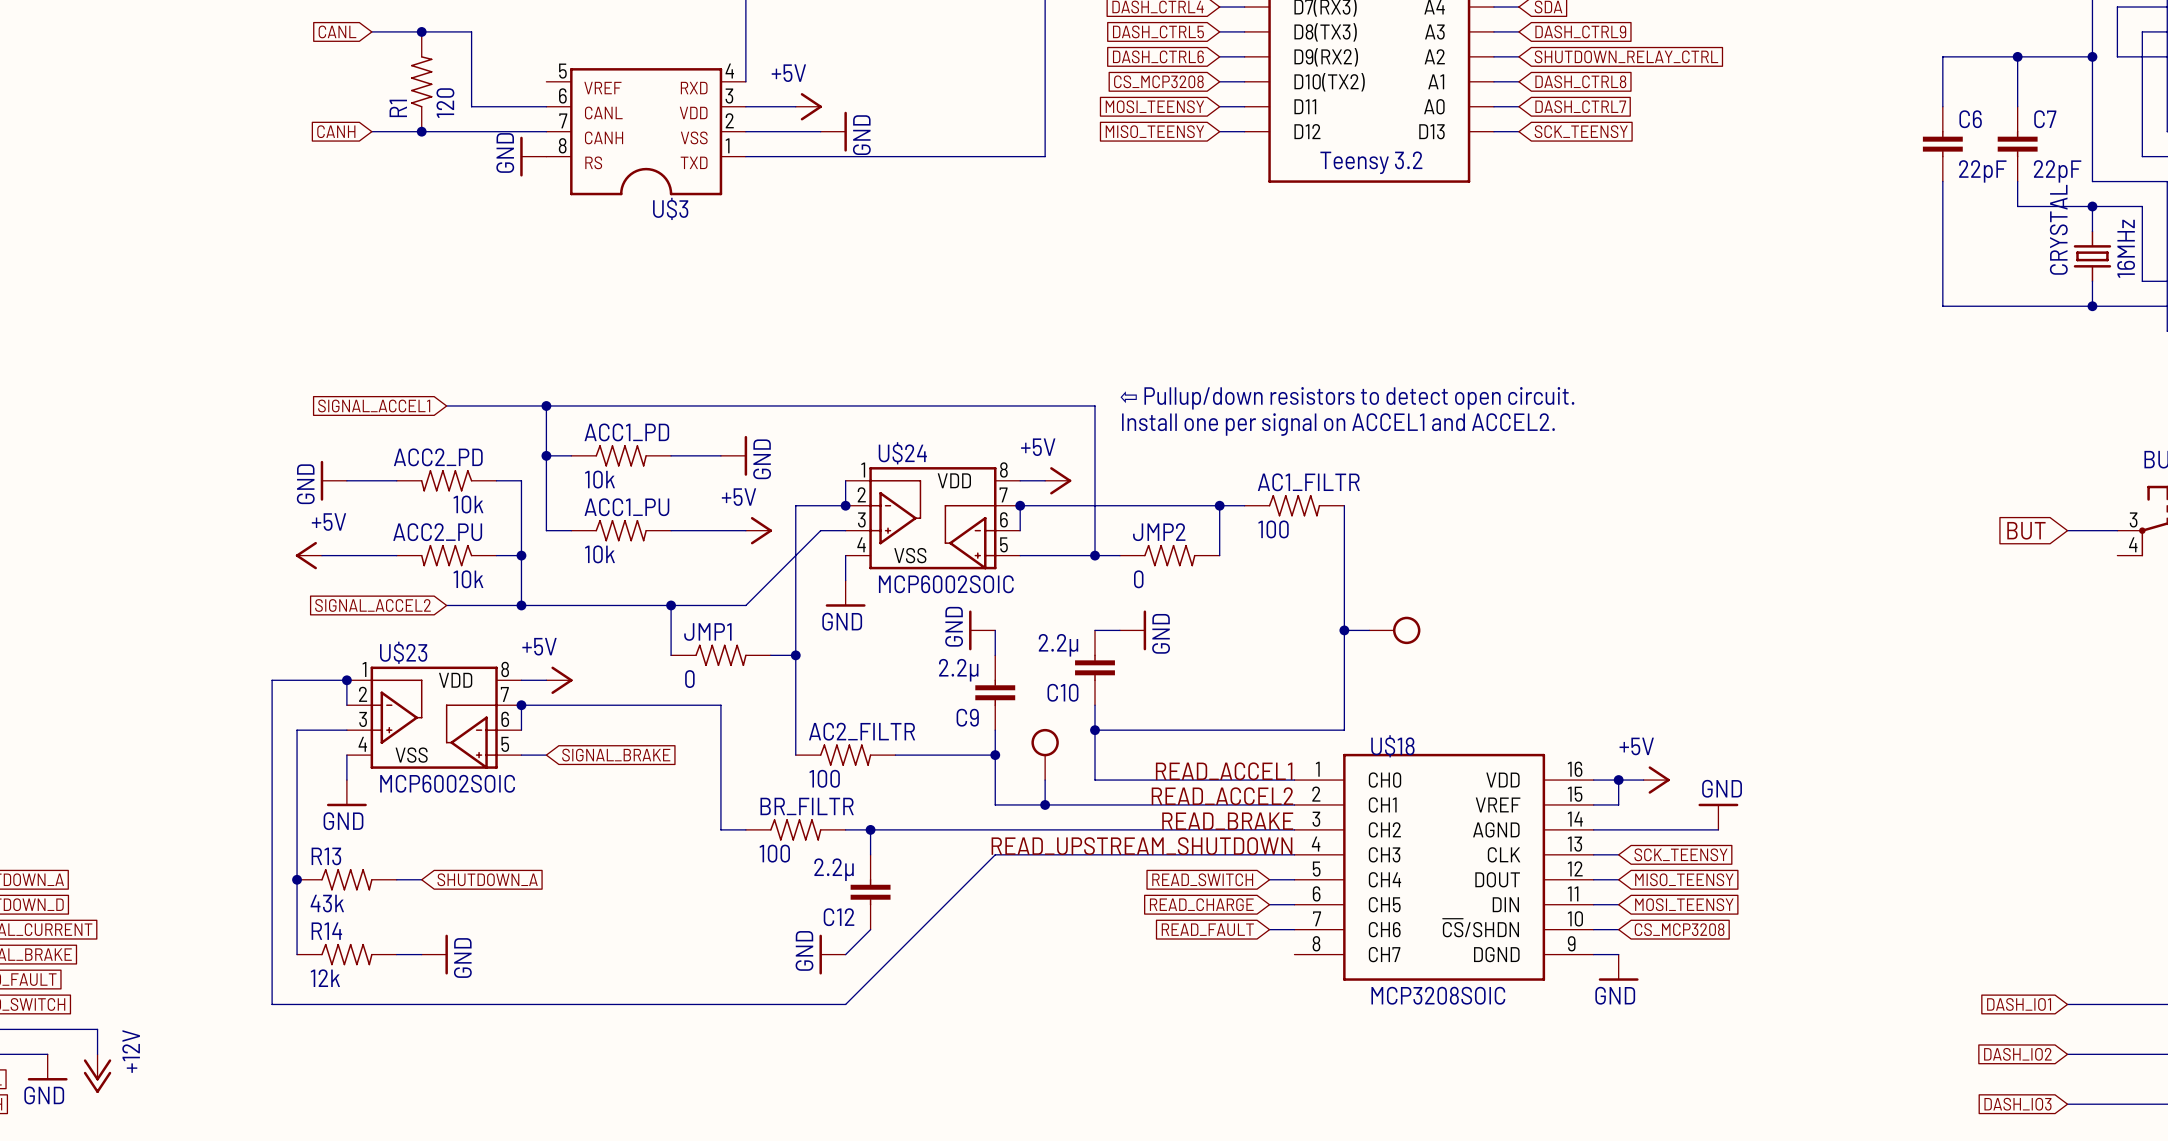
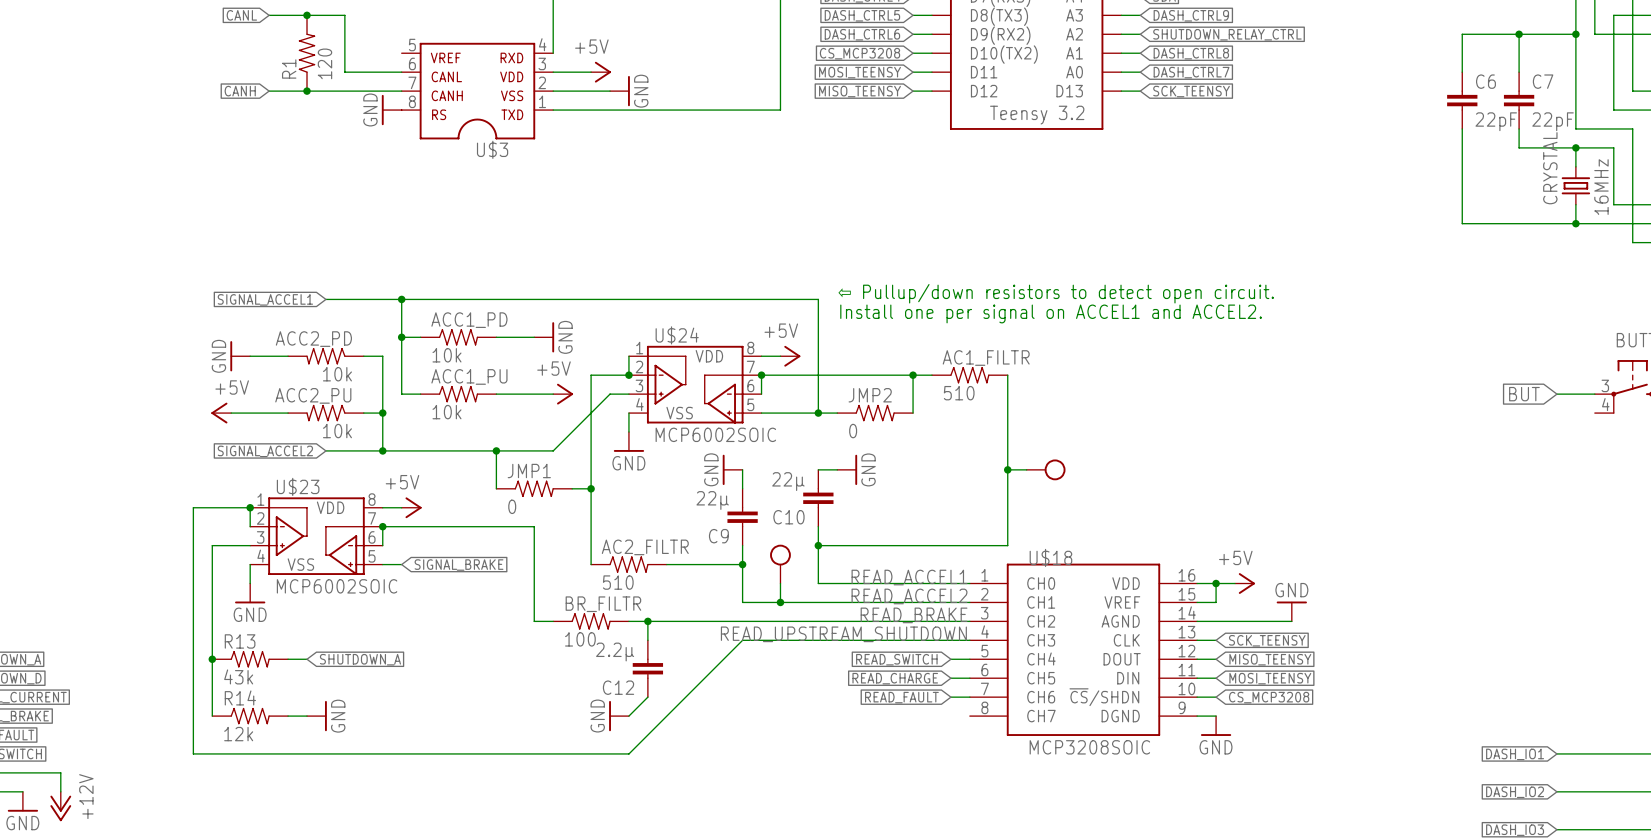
AC1_FILTR value: 100 (1273, 529) -> 510 (959, 393)
C10 value: 2.2µ (1058, 645) -> 22µ (788, 481)
C9 value: 2.2µ (958, 670) -> 22µ (712, 500)
AC2_FILTR value: 100 (824, 778) -> 510 (618, 582)

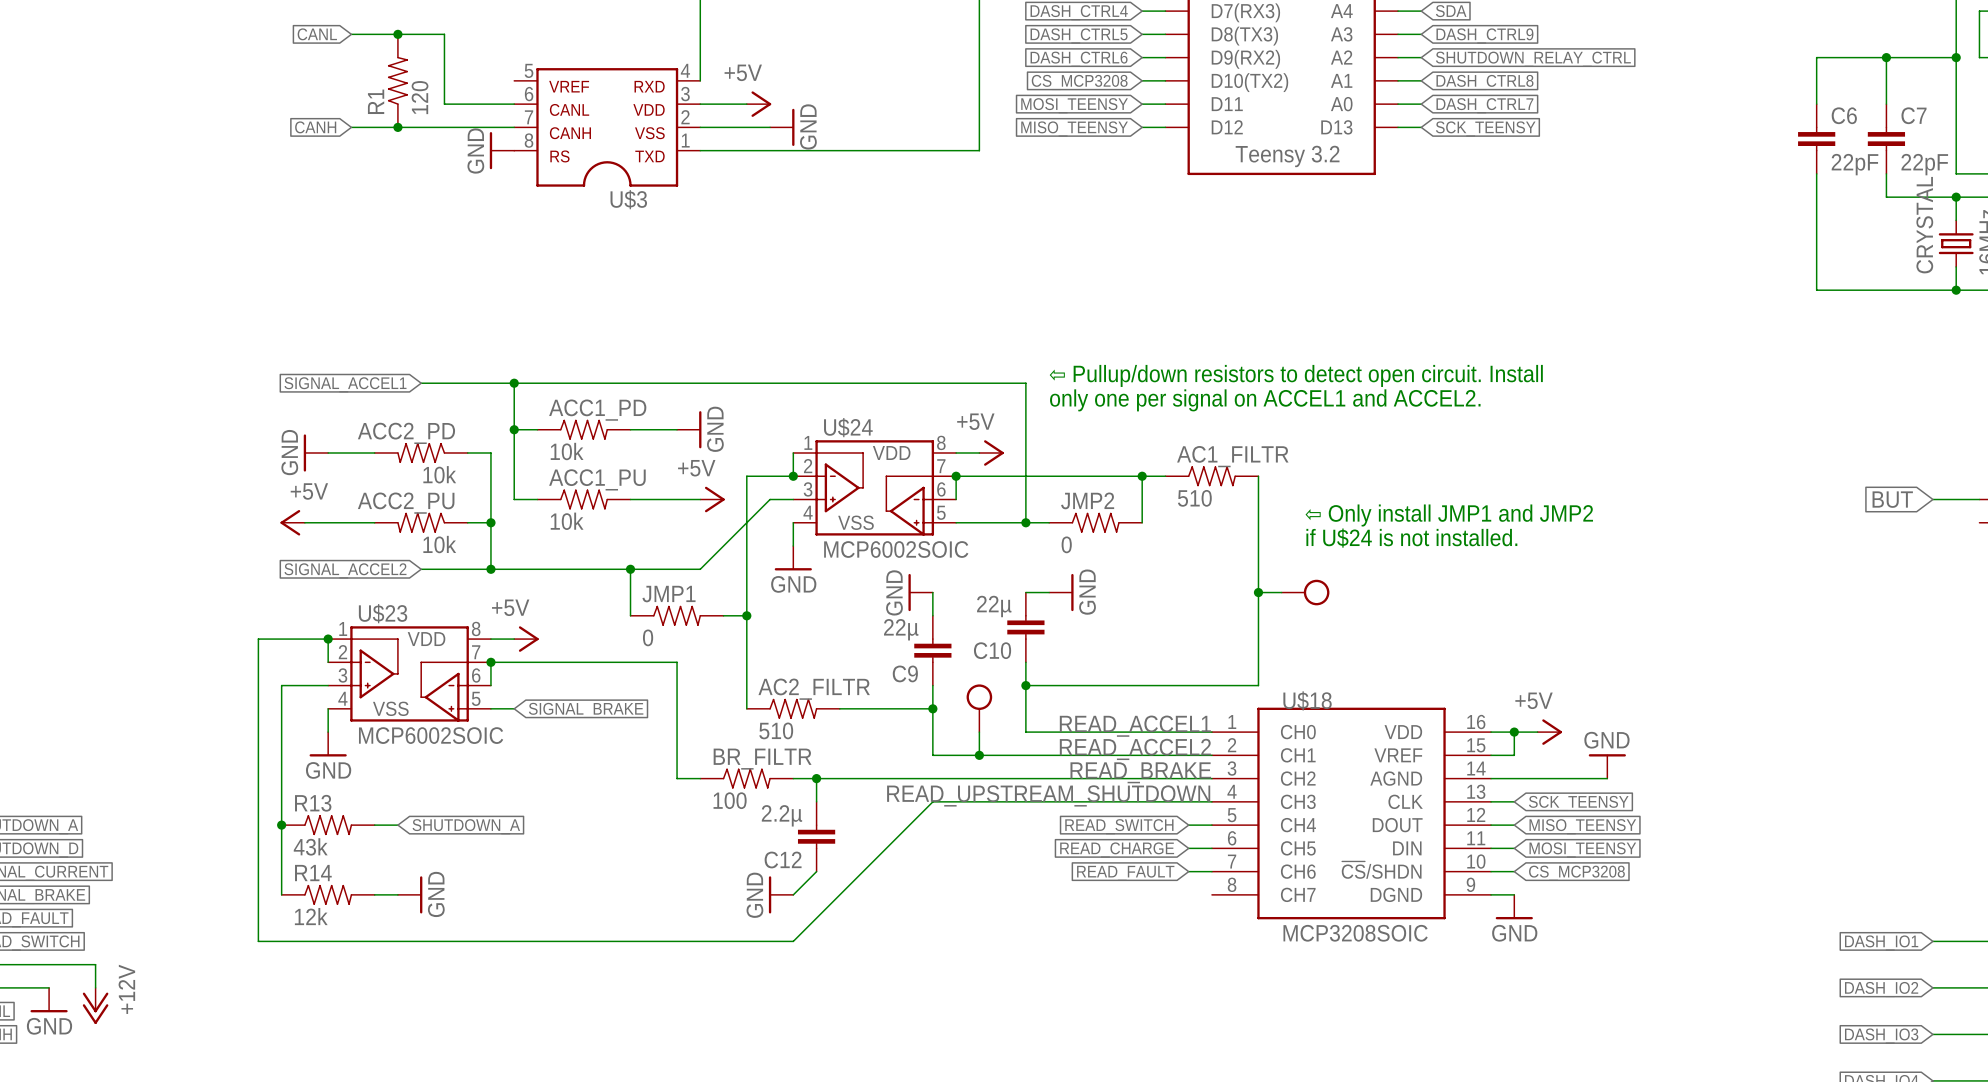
text: ⇦ Pullup/down resistors to detect open circuit. (1055, 293) -> ⇦ Pullup/down resistors to detect open circuit. Install (1296, 375)
text: Install one per signal on ACCEL1 and ACCEL2. (1051, 313) -> only one per signal on ACCEL1 and ACCEL2. (1265, 400)
text: none -> ⇦ Only install JMP1 and JMP2 (1449, 515)
text: none -> if U$24 is not installed. (1411, 538)

